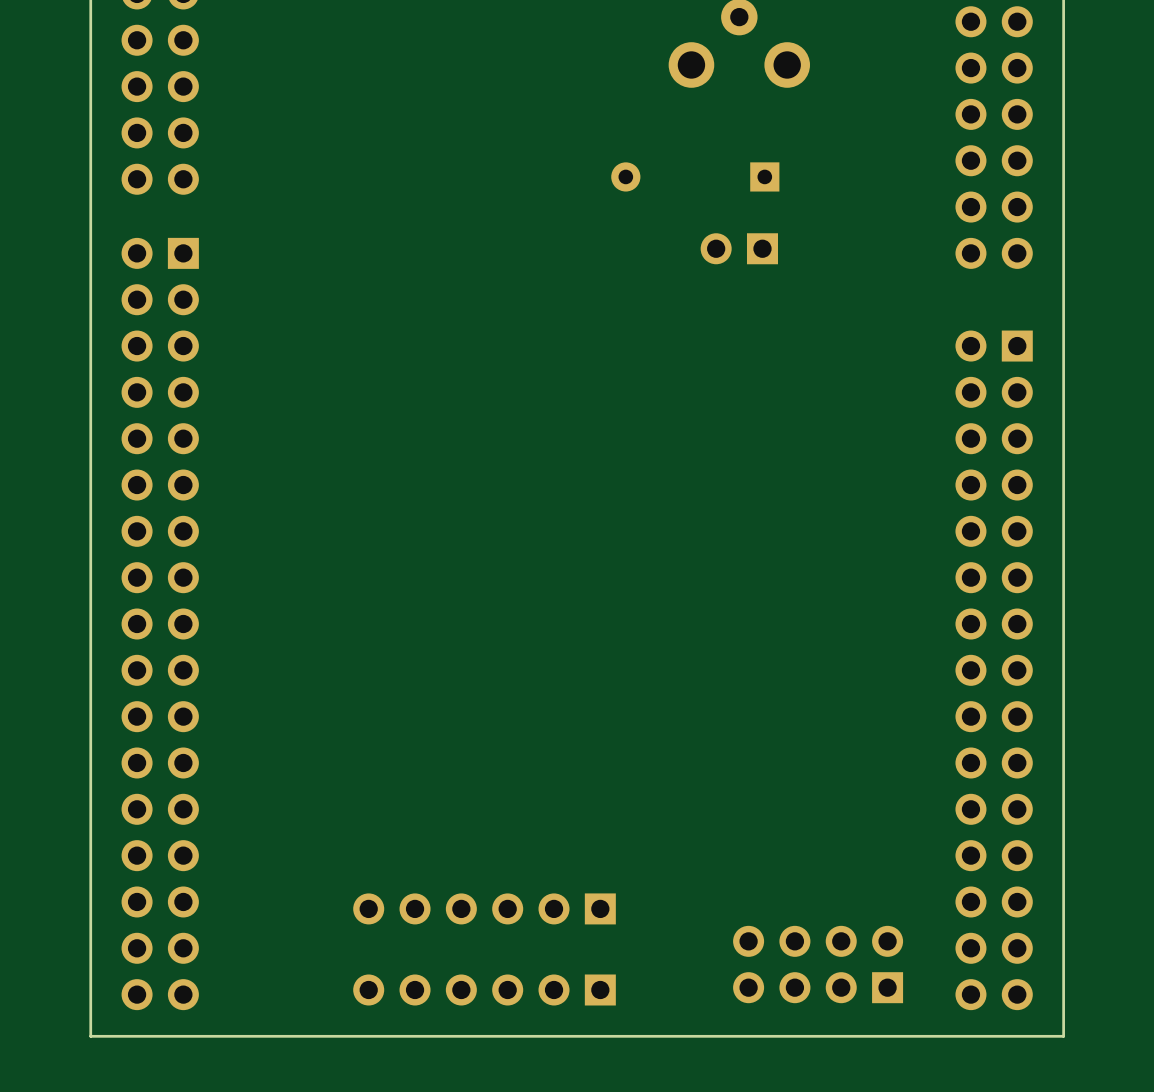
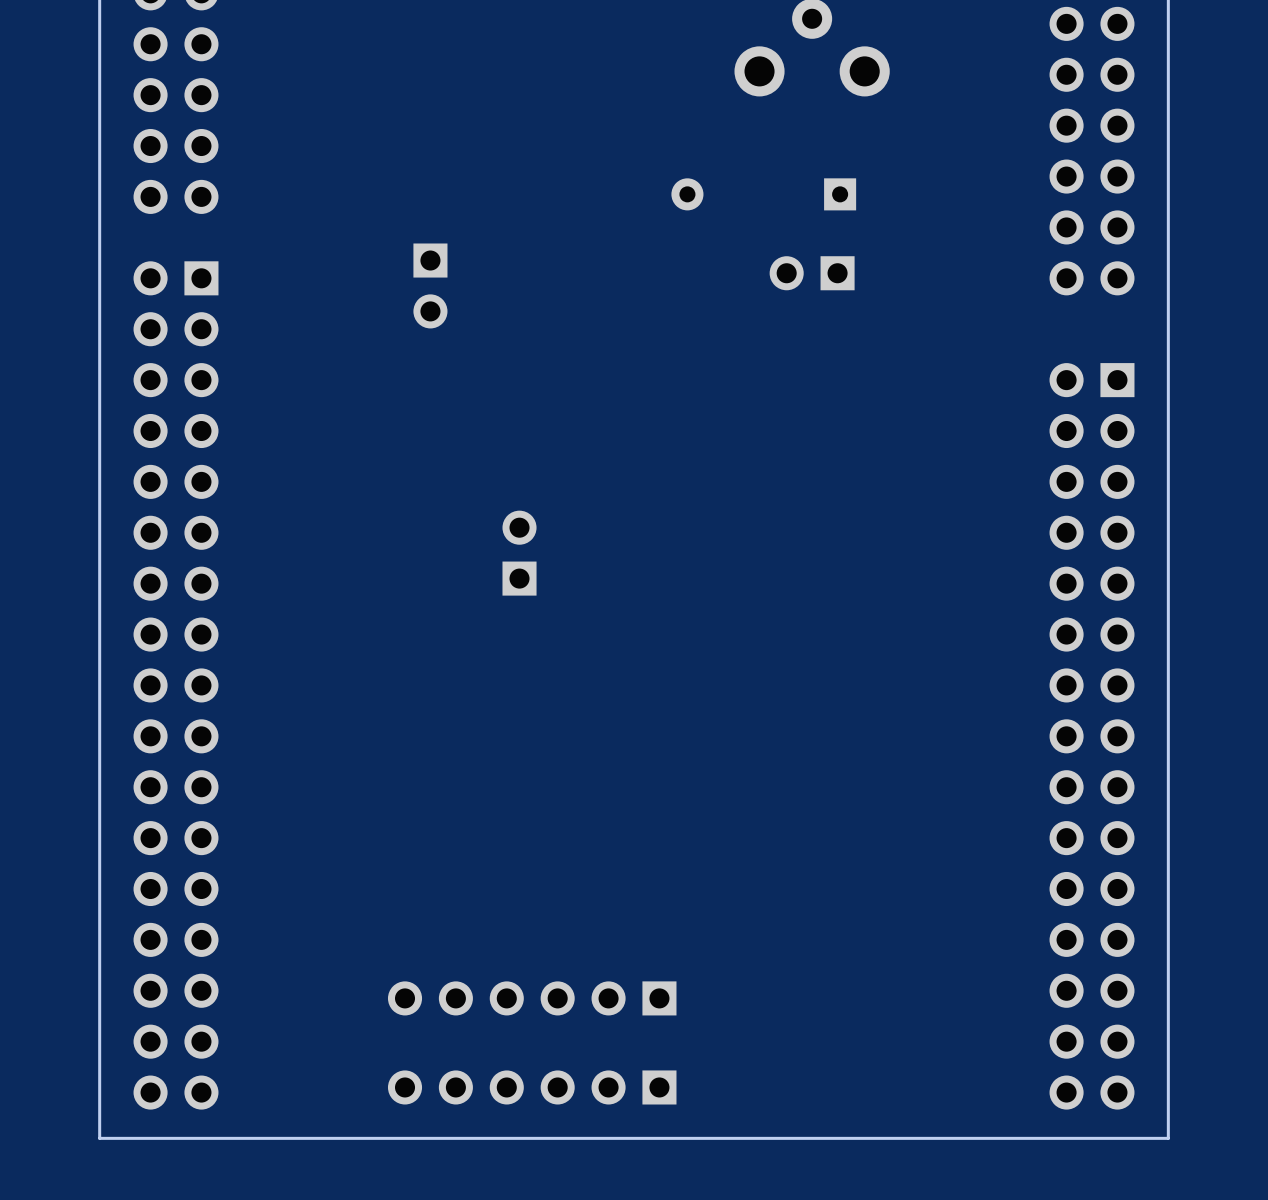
part: none -> (430, 285)
part: none -> (519, 553)
part: (818, 964) -> none

